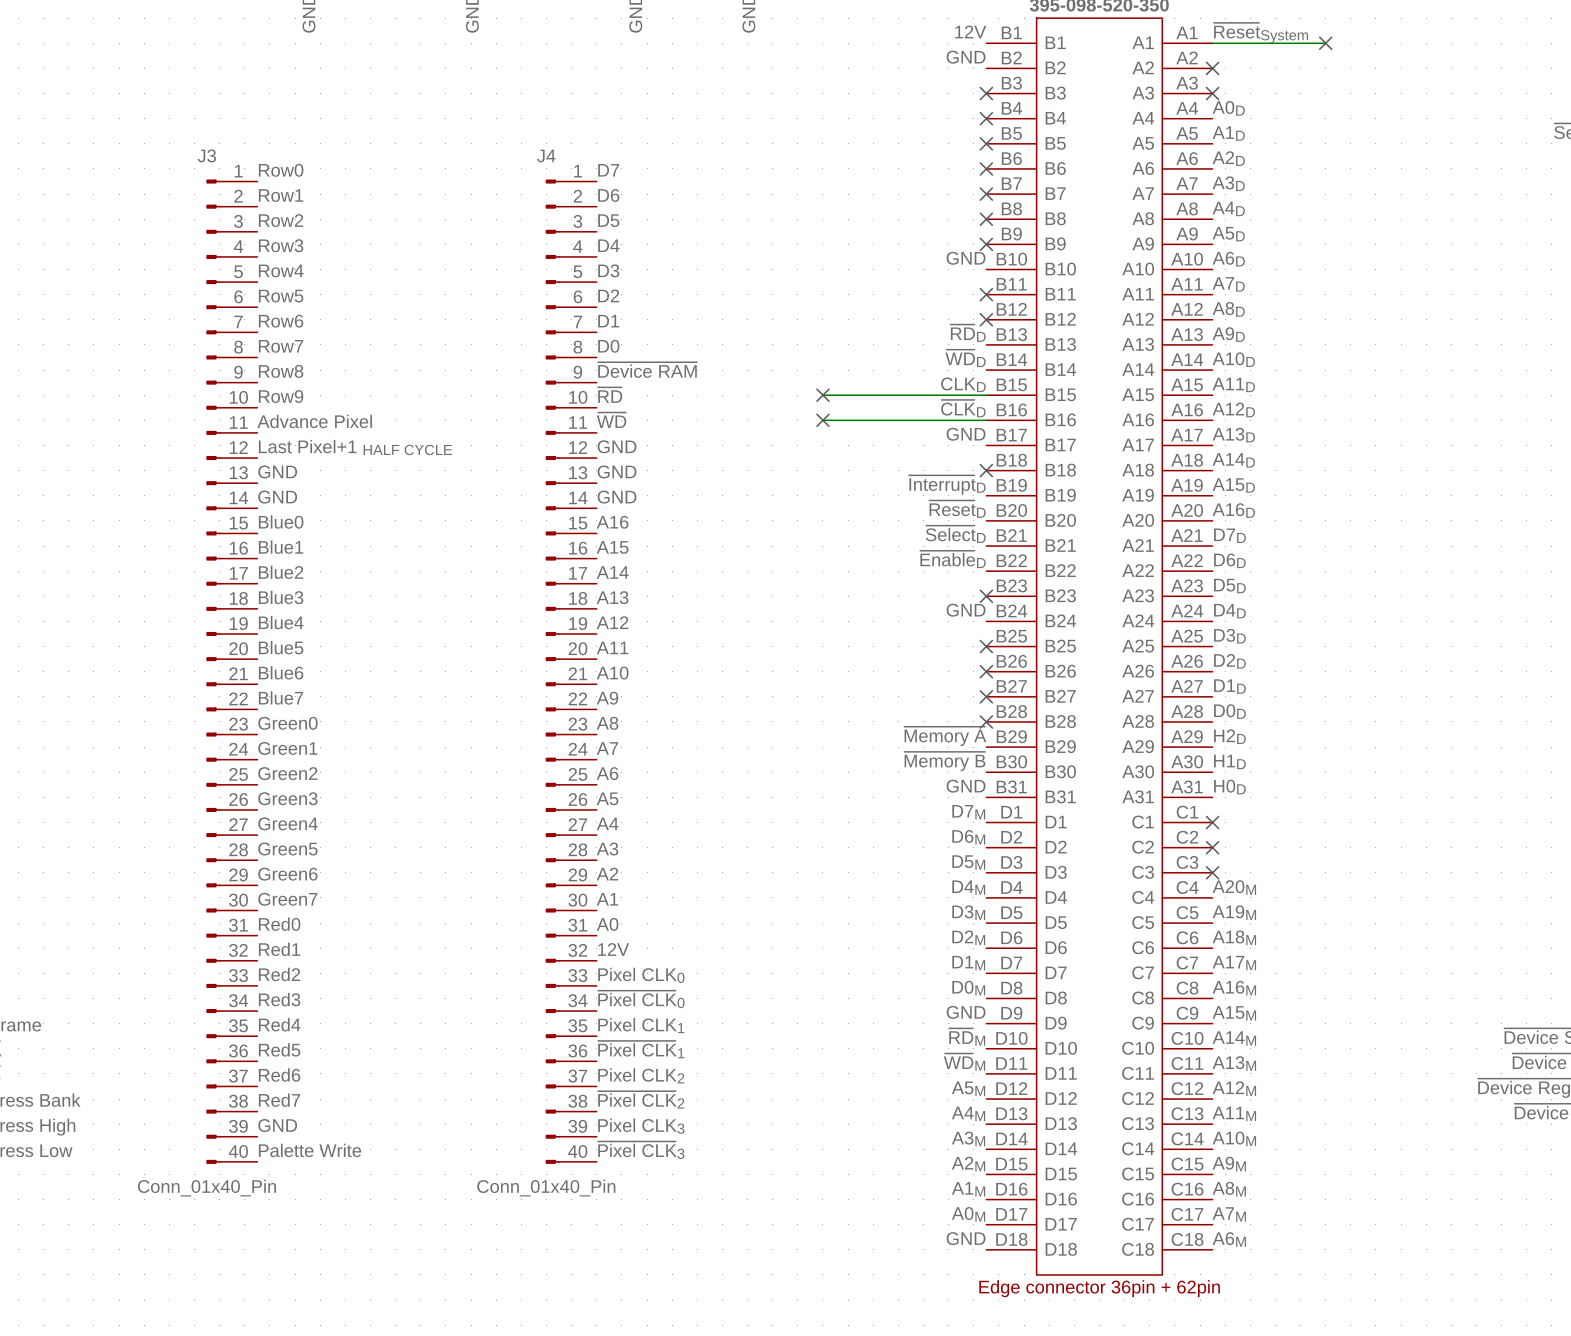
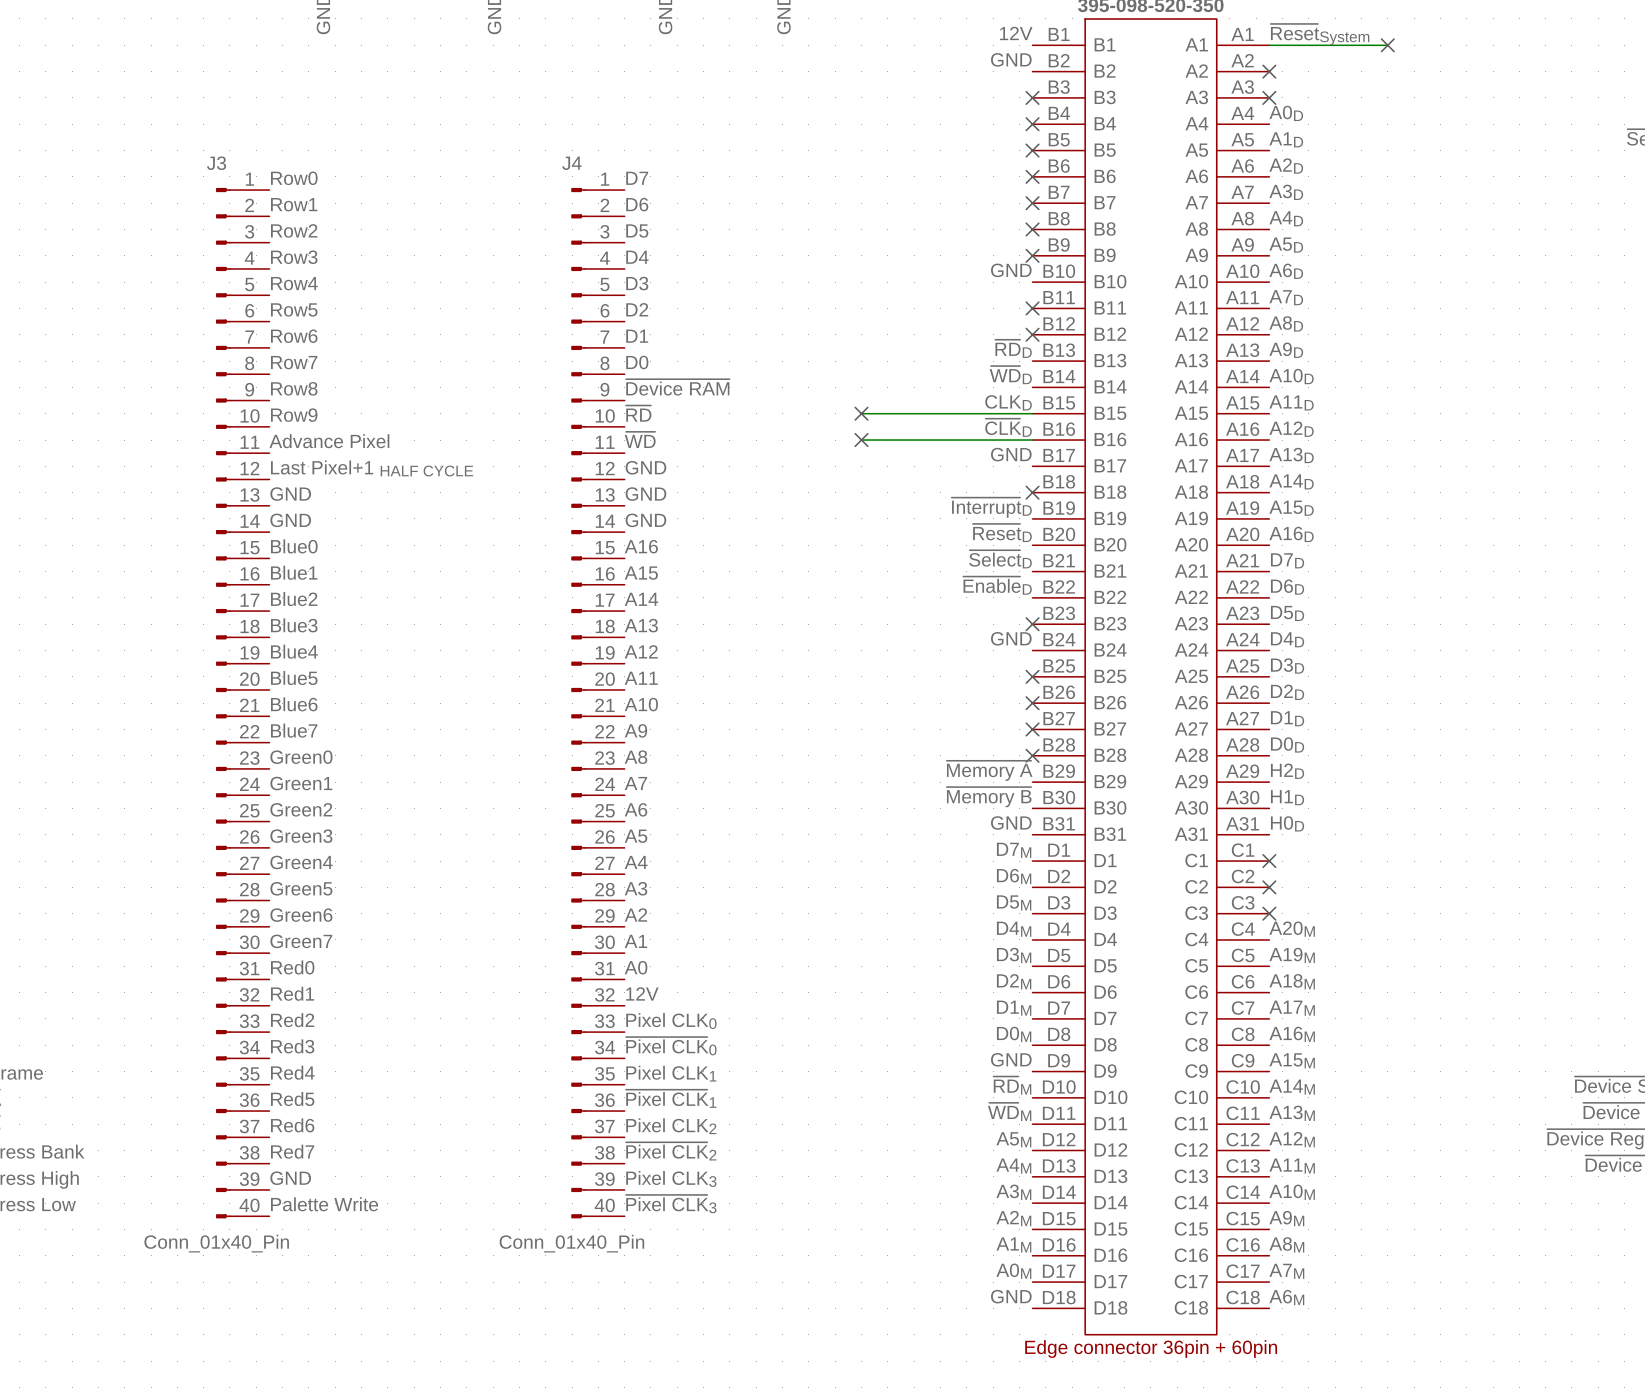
part text: Edge connector 36pin + 62pin (1099, 1288) -> Edge connector 36pin + 60pin (1151, 1348)

